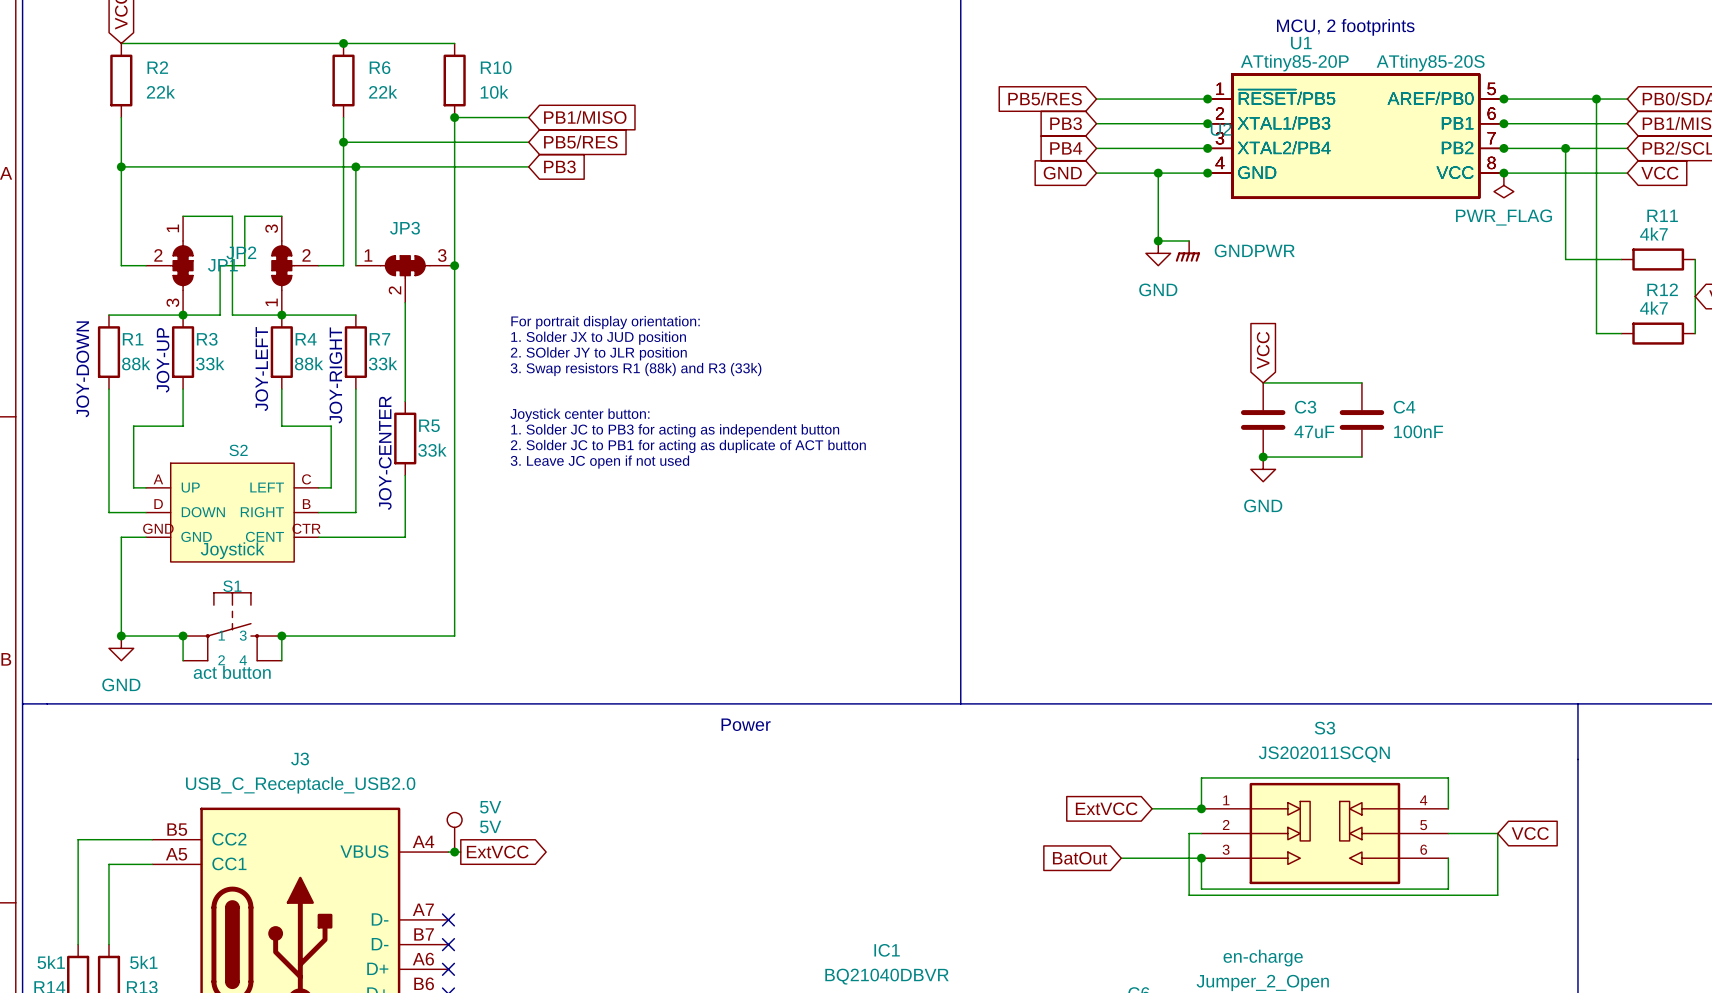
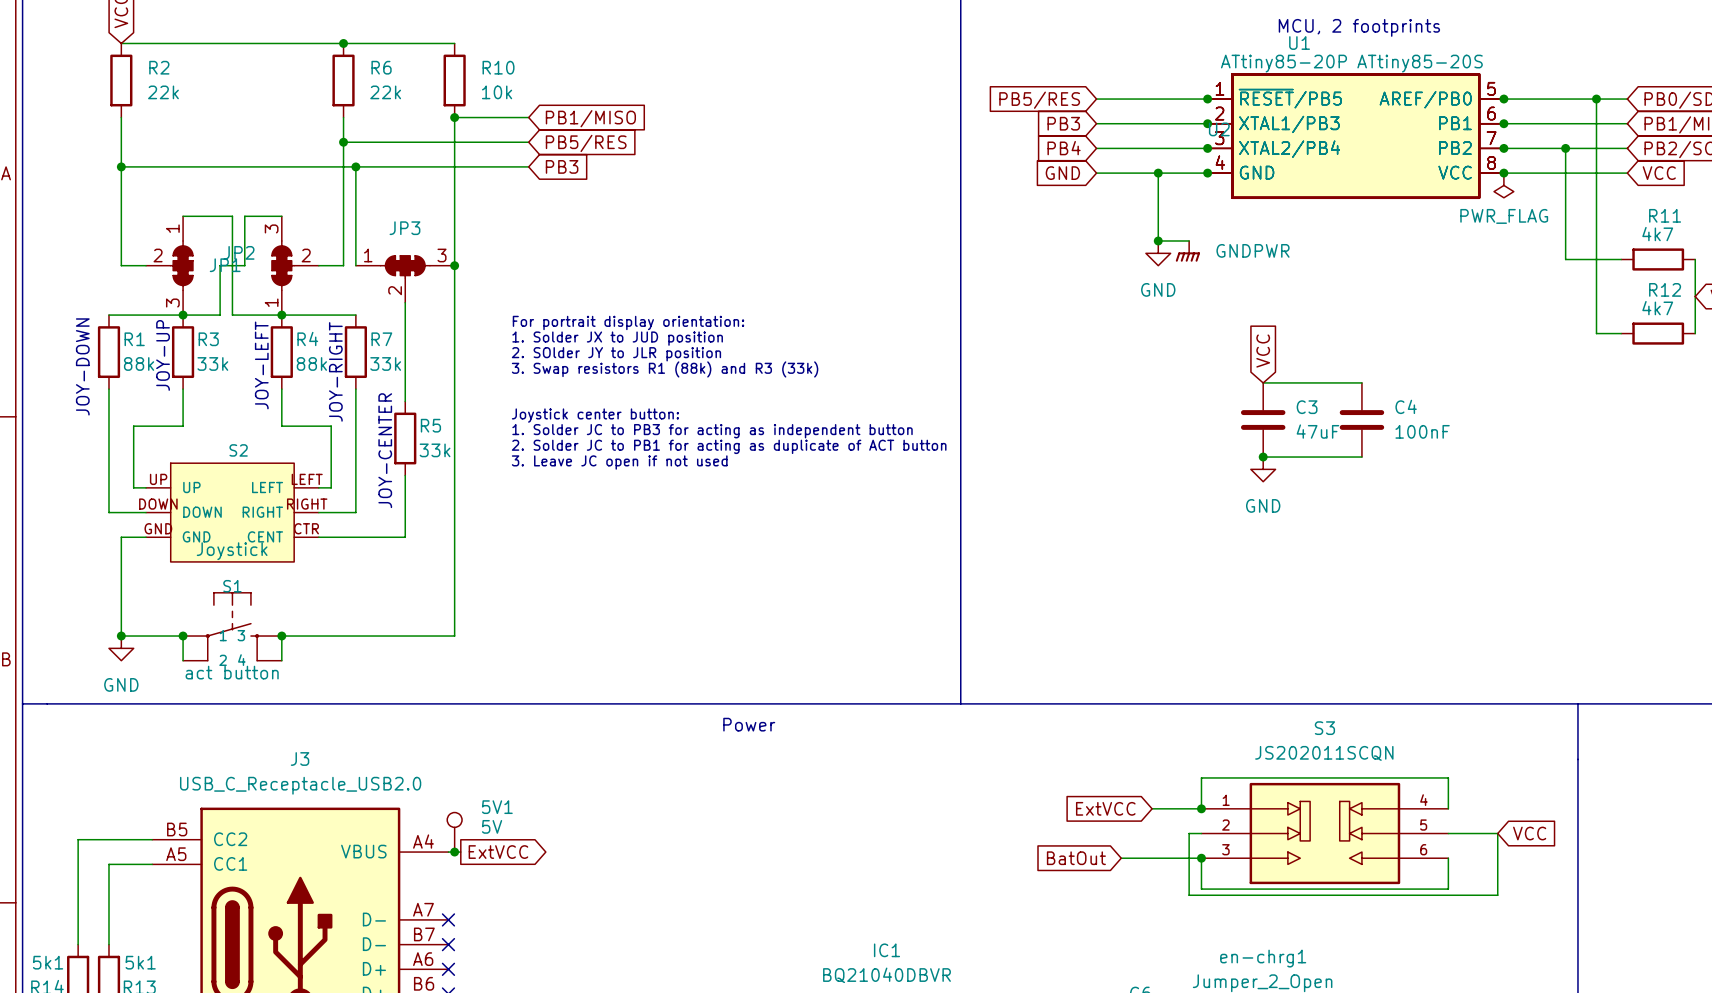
S2 pin number: A (158, 479) -> UP (158, 479)
S2 pin number: C (306, 479) -> LEFT (307, 479)
S2 pin number: D (158, 504) -> DOWN (158, 504)
S2 pin number: B (306, 504) -> RIGHT (307, 504)
5V name: 5V (490, 807) -> 5V1 (497, 807)
en-charge name: en-charge (1263, 958) -> en-chrg1 (1263, 958)

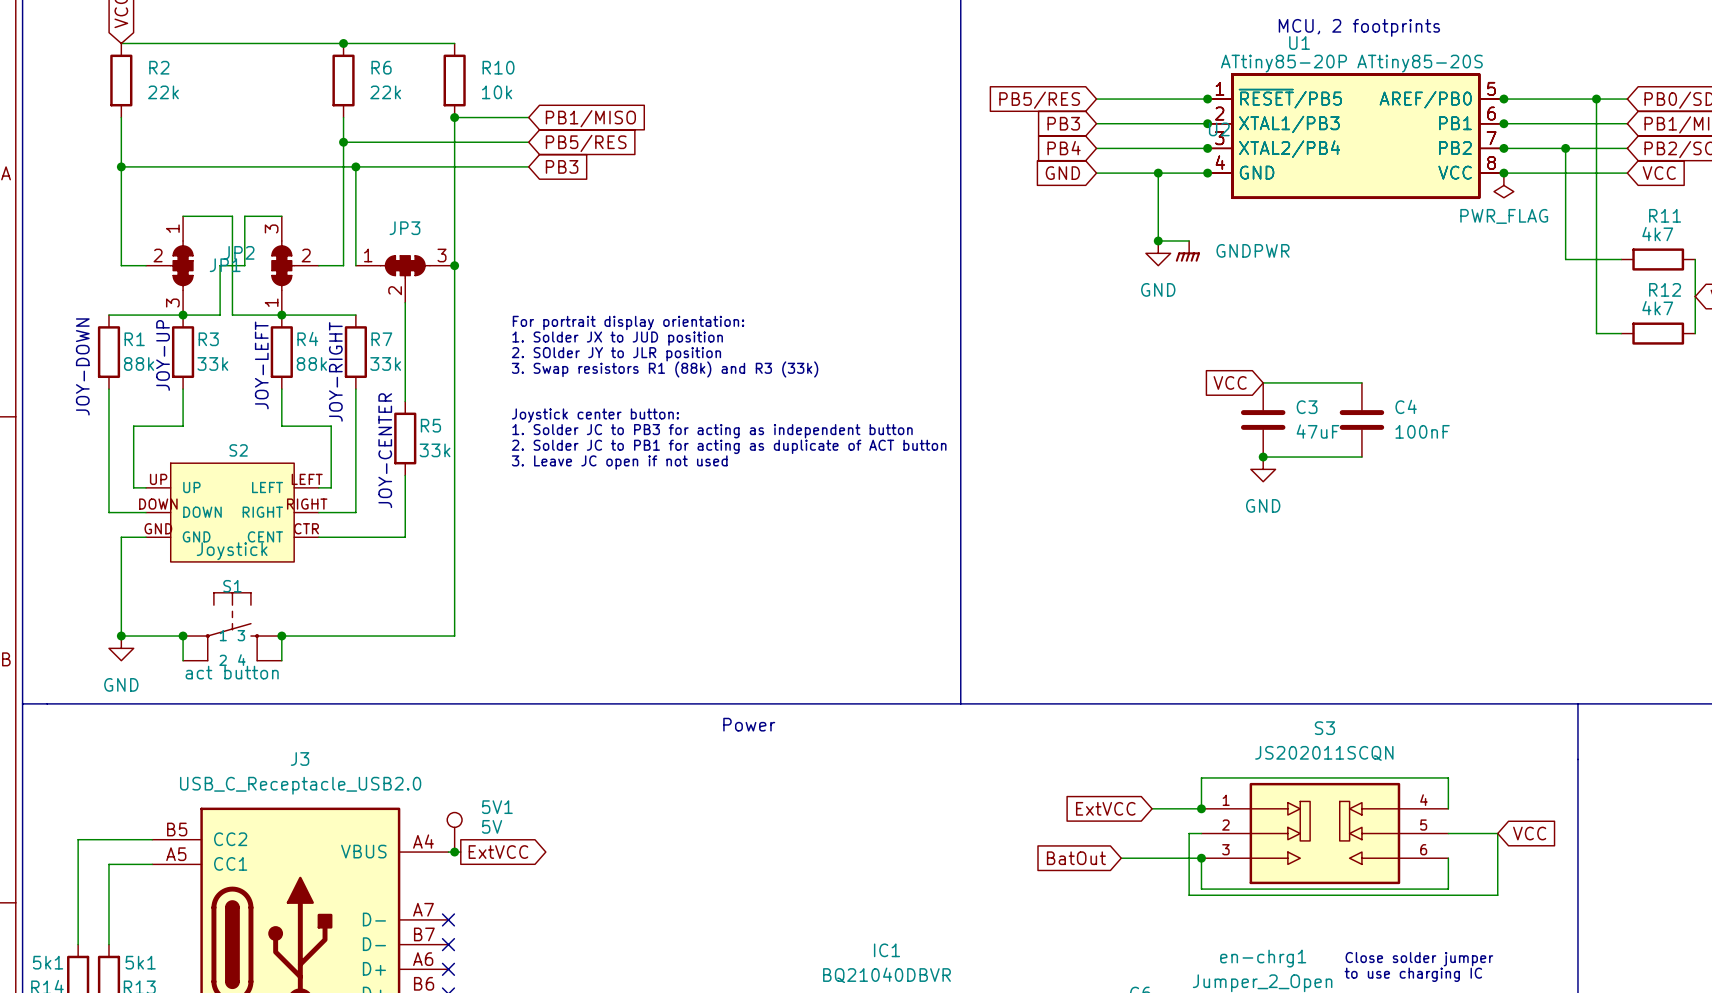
global label rotation: 0° (1263, 351) -> 90° counterclockwise (1230, 382)
text: none -> Close solder jumper (1419, 959)
text: none -> to use charging IC (1413, 974)

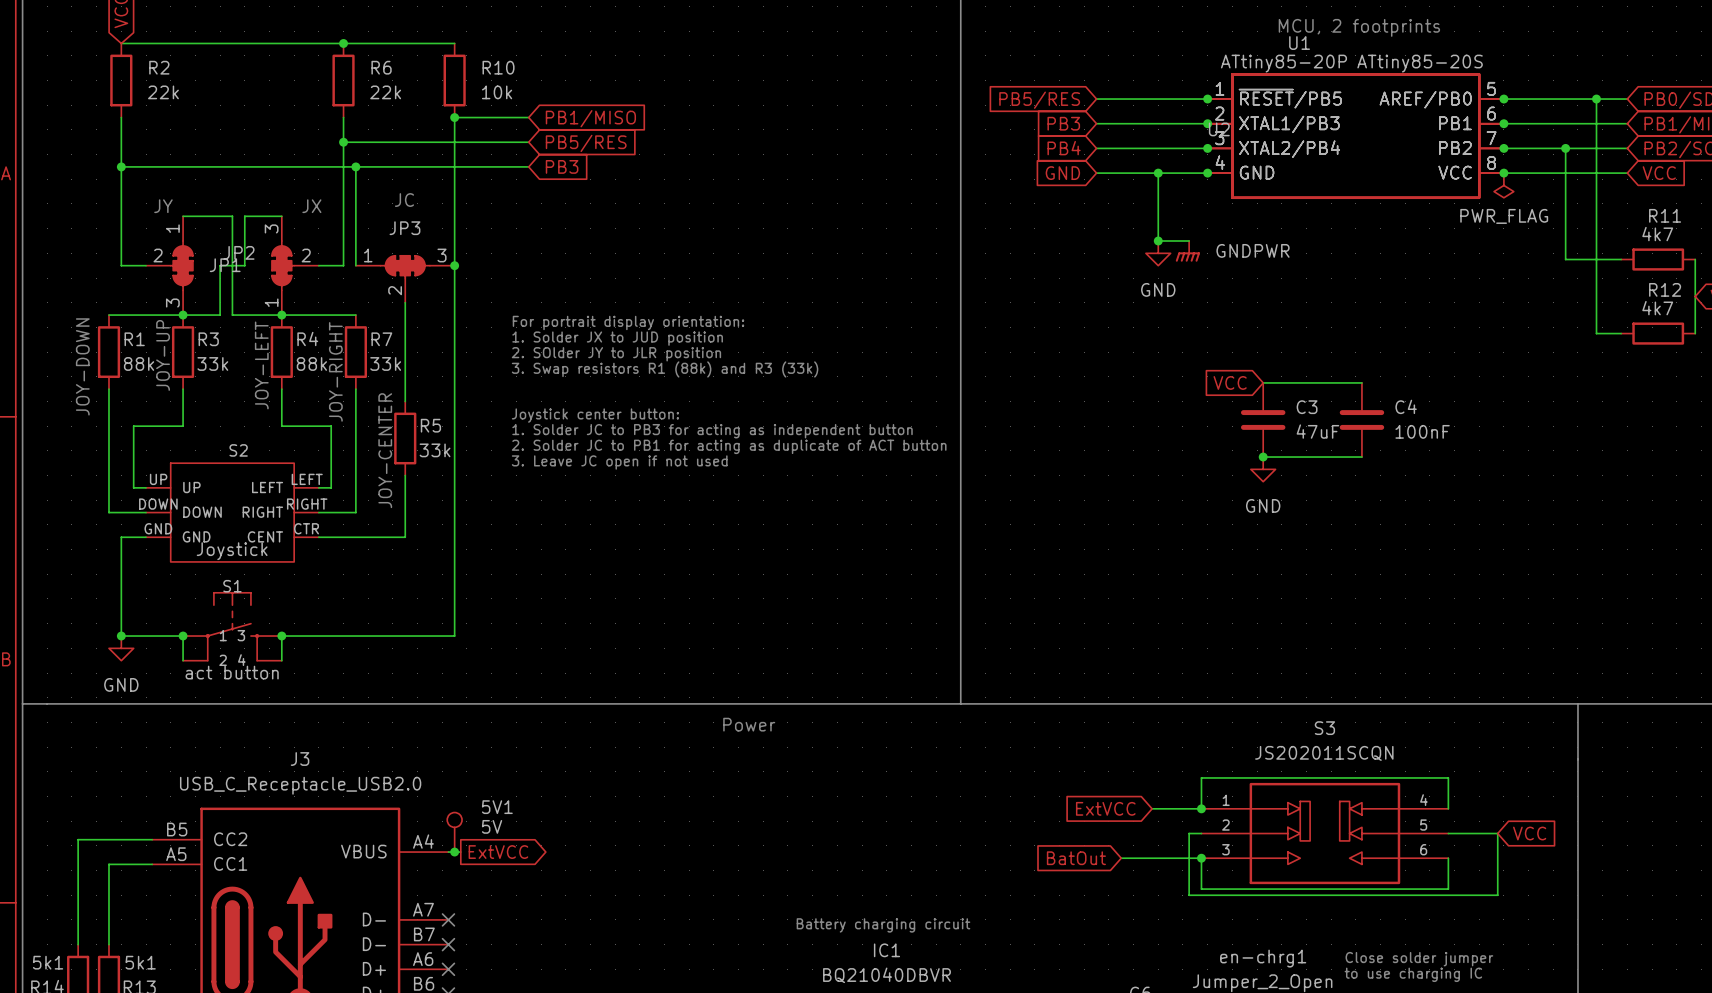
text: none -> JC (404, 200)
text: none -> JY (163, 206)
text: none -> JX (311, 206)
text: none -> Battery charging circuit (883, 925)

